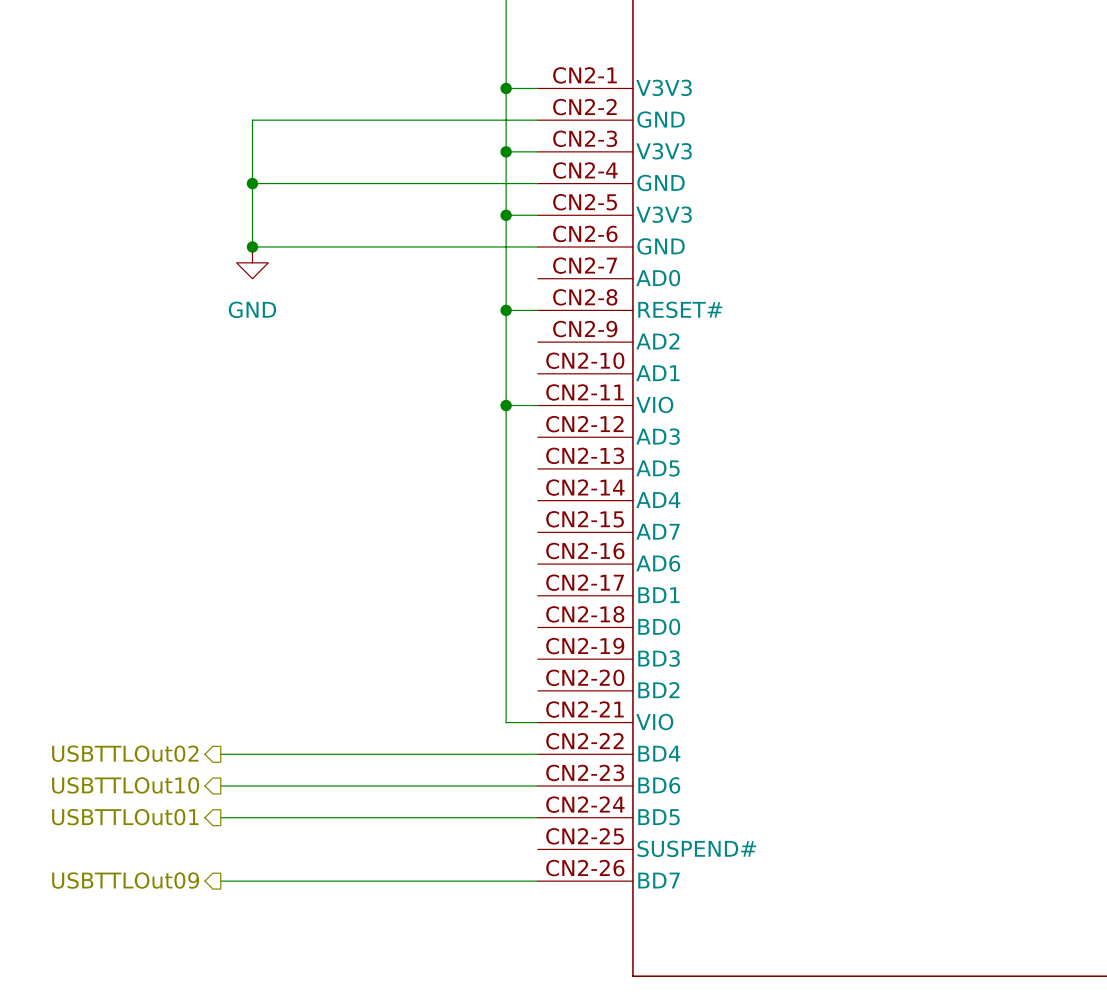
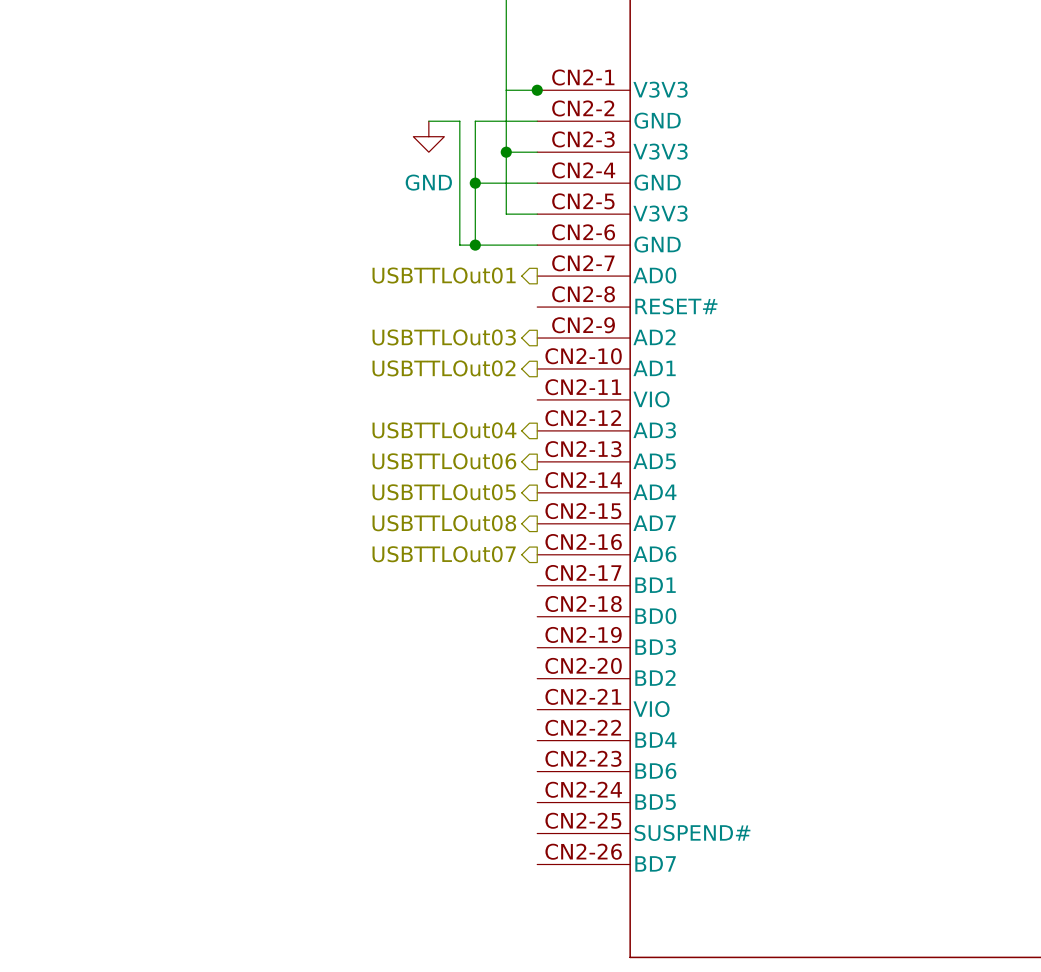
junction position: (506, 88) -> (537, 90)
wire: (426, 120) (252, 120) (252, 246) (458, 246) -> (459, 121) (459, 245)
wire: (458, 120) (474, 120) -> (475, 245) (475, 121)
wire: (252, 183) (474, 183) -> none
junction: (252, 183) -> none
junction: none -> (475, 183)
wire: (506, 215) (506, 722) (537, 722) -> none
junction: (506, 215) -> none
junction: (252, 246) -> none
junction: none -> (475, 245)
power symbol position: GND (252, 262) -> GND (428, 136)
hierarchical label: none -> USBTTLOut01 (444, 275)
wire: (506, 310) (537, 310) -> none
junction: (506, 310) -> none
hierarchical label: none -> USBTTLOut03 (444, 337)
hierarchical label: none -> USBTTLOut02 (443, 368)
wire: (506, 405) (537, 405) -> none
junction: (506, 405) -> none
hierarchical label: none -> USBTTLOut04 (444, 430)
hierarchical label: none -> USBTTLOut06 (444, 461)
hierarchical label: none -> USBTTLOut05 (444, 492)
hierarchical label: none -> USBTTLOut08 (444, 523)
hierarchical label: none -> USBTTLOut07 (444, 554)
hierarchical label: USBTTLOut02 (125, 753) -> none
wire: (220, 754) (537, 754) -> none
hierarchical label: USBTTLOut10 (125, 785) -> none
wire: (220, 786) (537, 786) -> none
hierarchical label: USBTTLOut01 (125, 817) -> none
wire: (220, 817) (537, 817) -> none
hierarchical label: USBTTLOut09 (125, 880) -> none
wire: (220, 881) (537, 881) -> none

